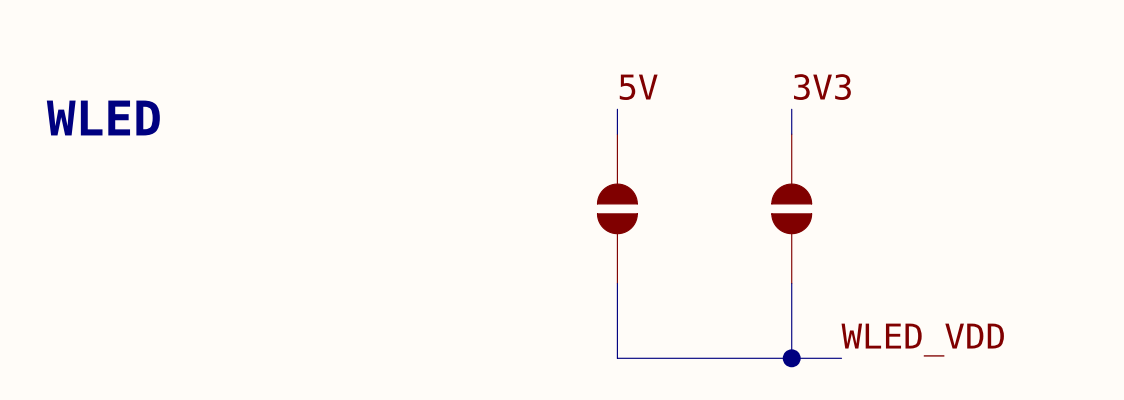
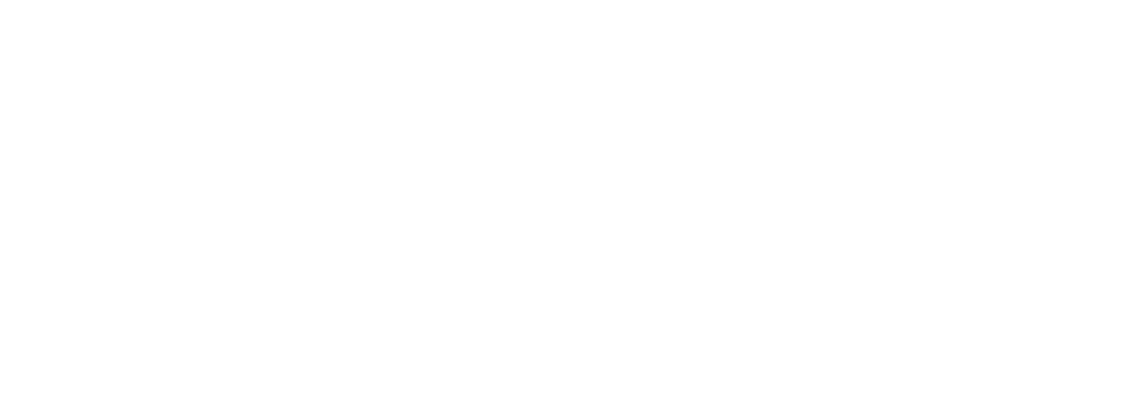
label: 5V (638, 87) -> none
label: 3V3 (822, 87) -> none
wire: (617, 109) (617, 134) -> none
wire: (791, 109) (791, 134) -> none
text: WLED (103, 118) -> none
part: (617, 208) -> none
part: (791, 208) -> none
wire: (617, 283) (617, 358) (841, 358) -> none
wire: (791, 283) (791, 358) -> none
label: WLED_VDD (922, 340) -> none
junction: (791, 358) -> none

